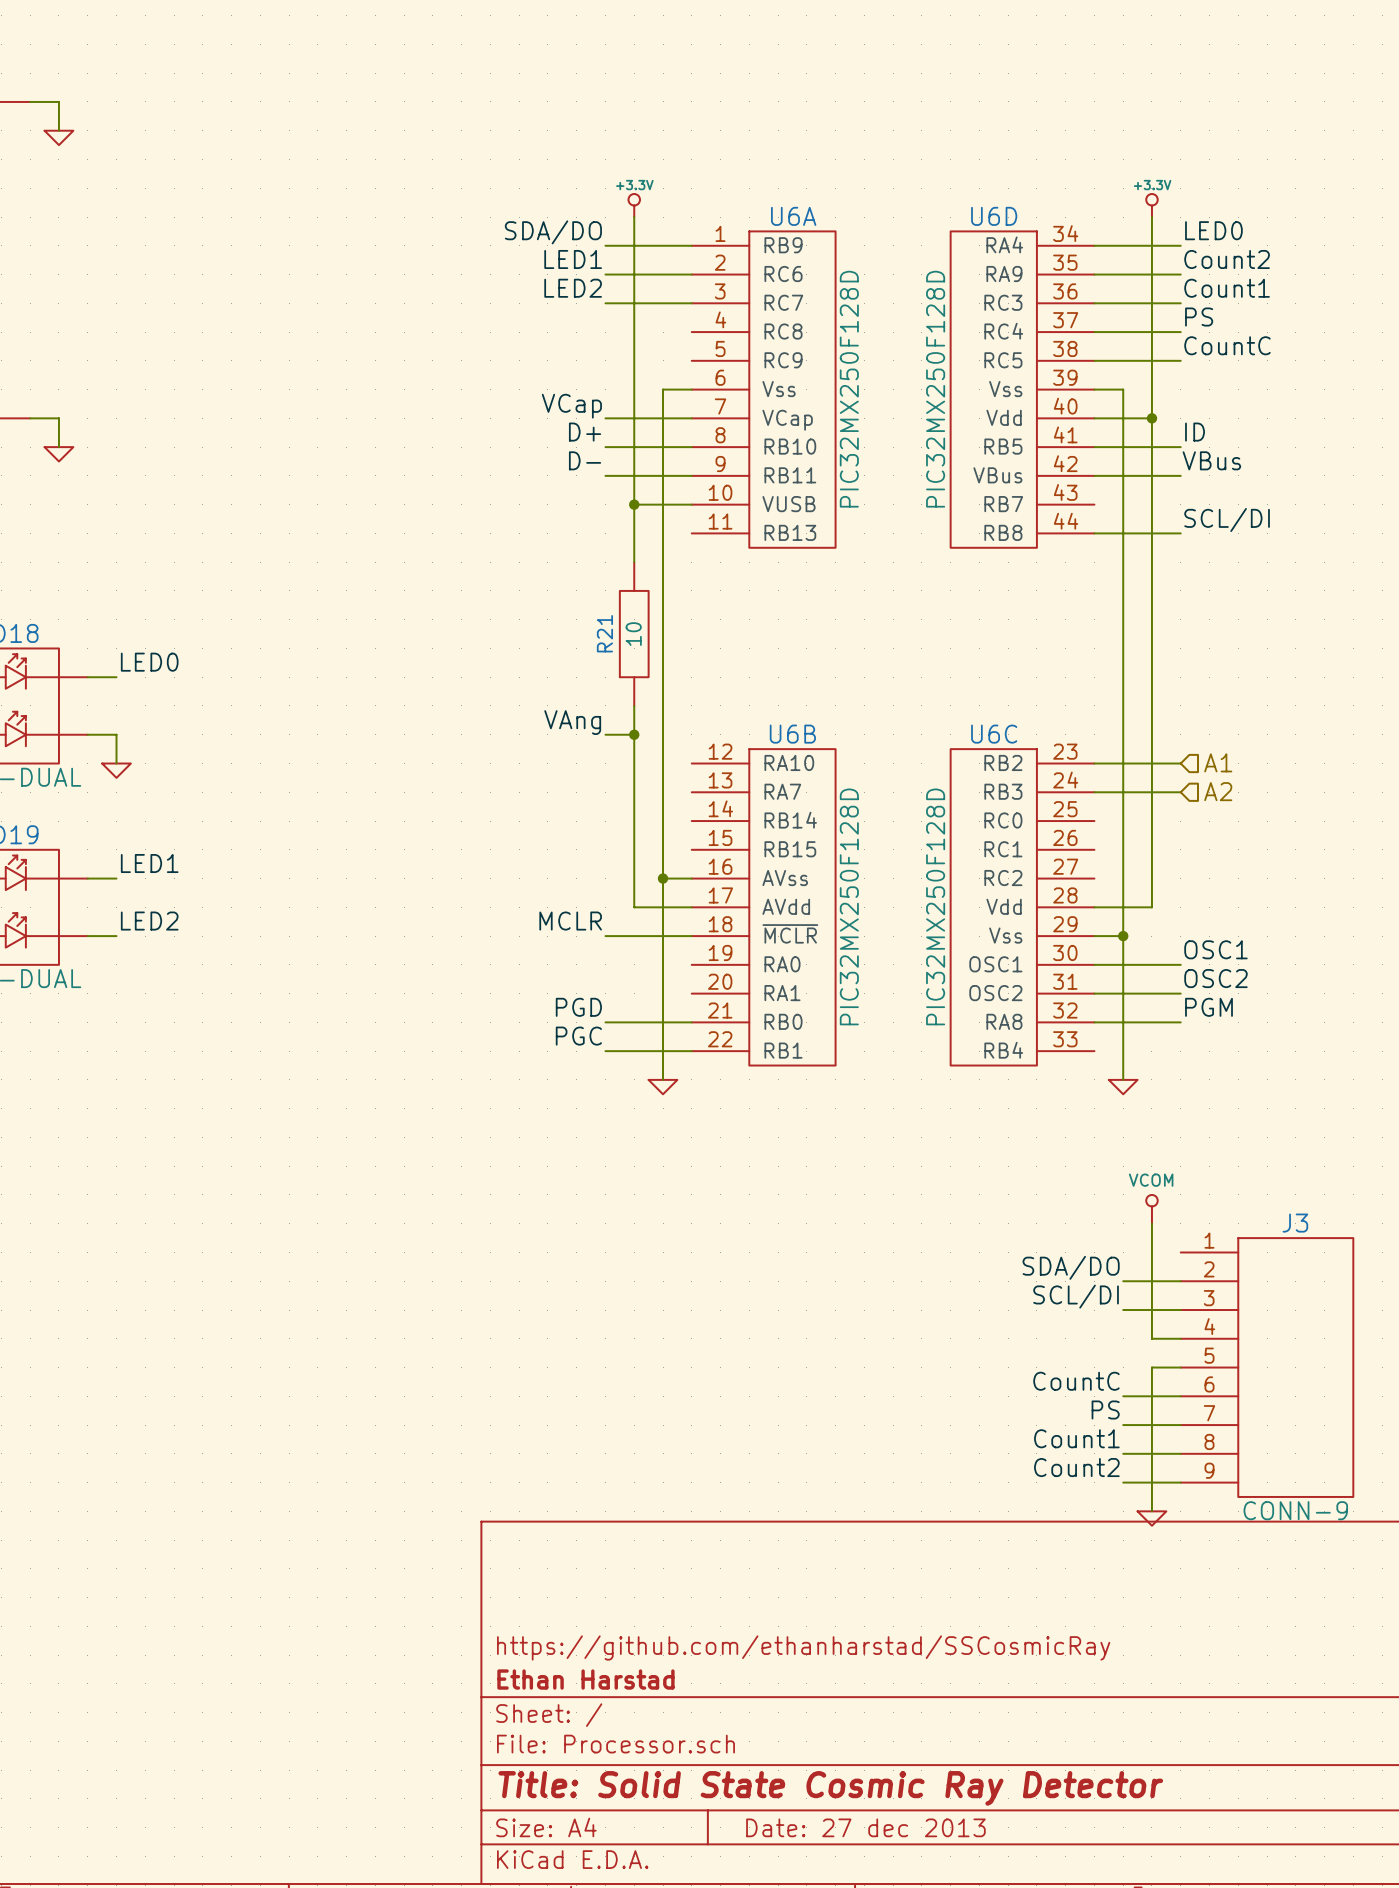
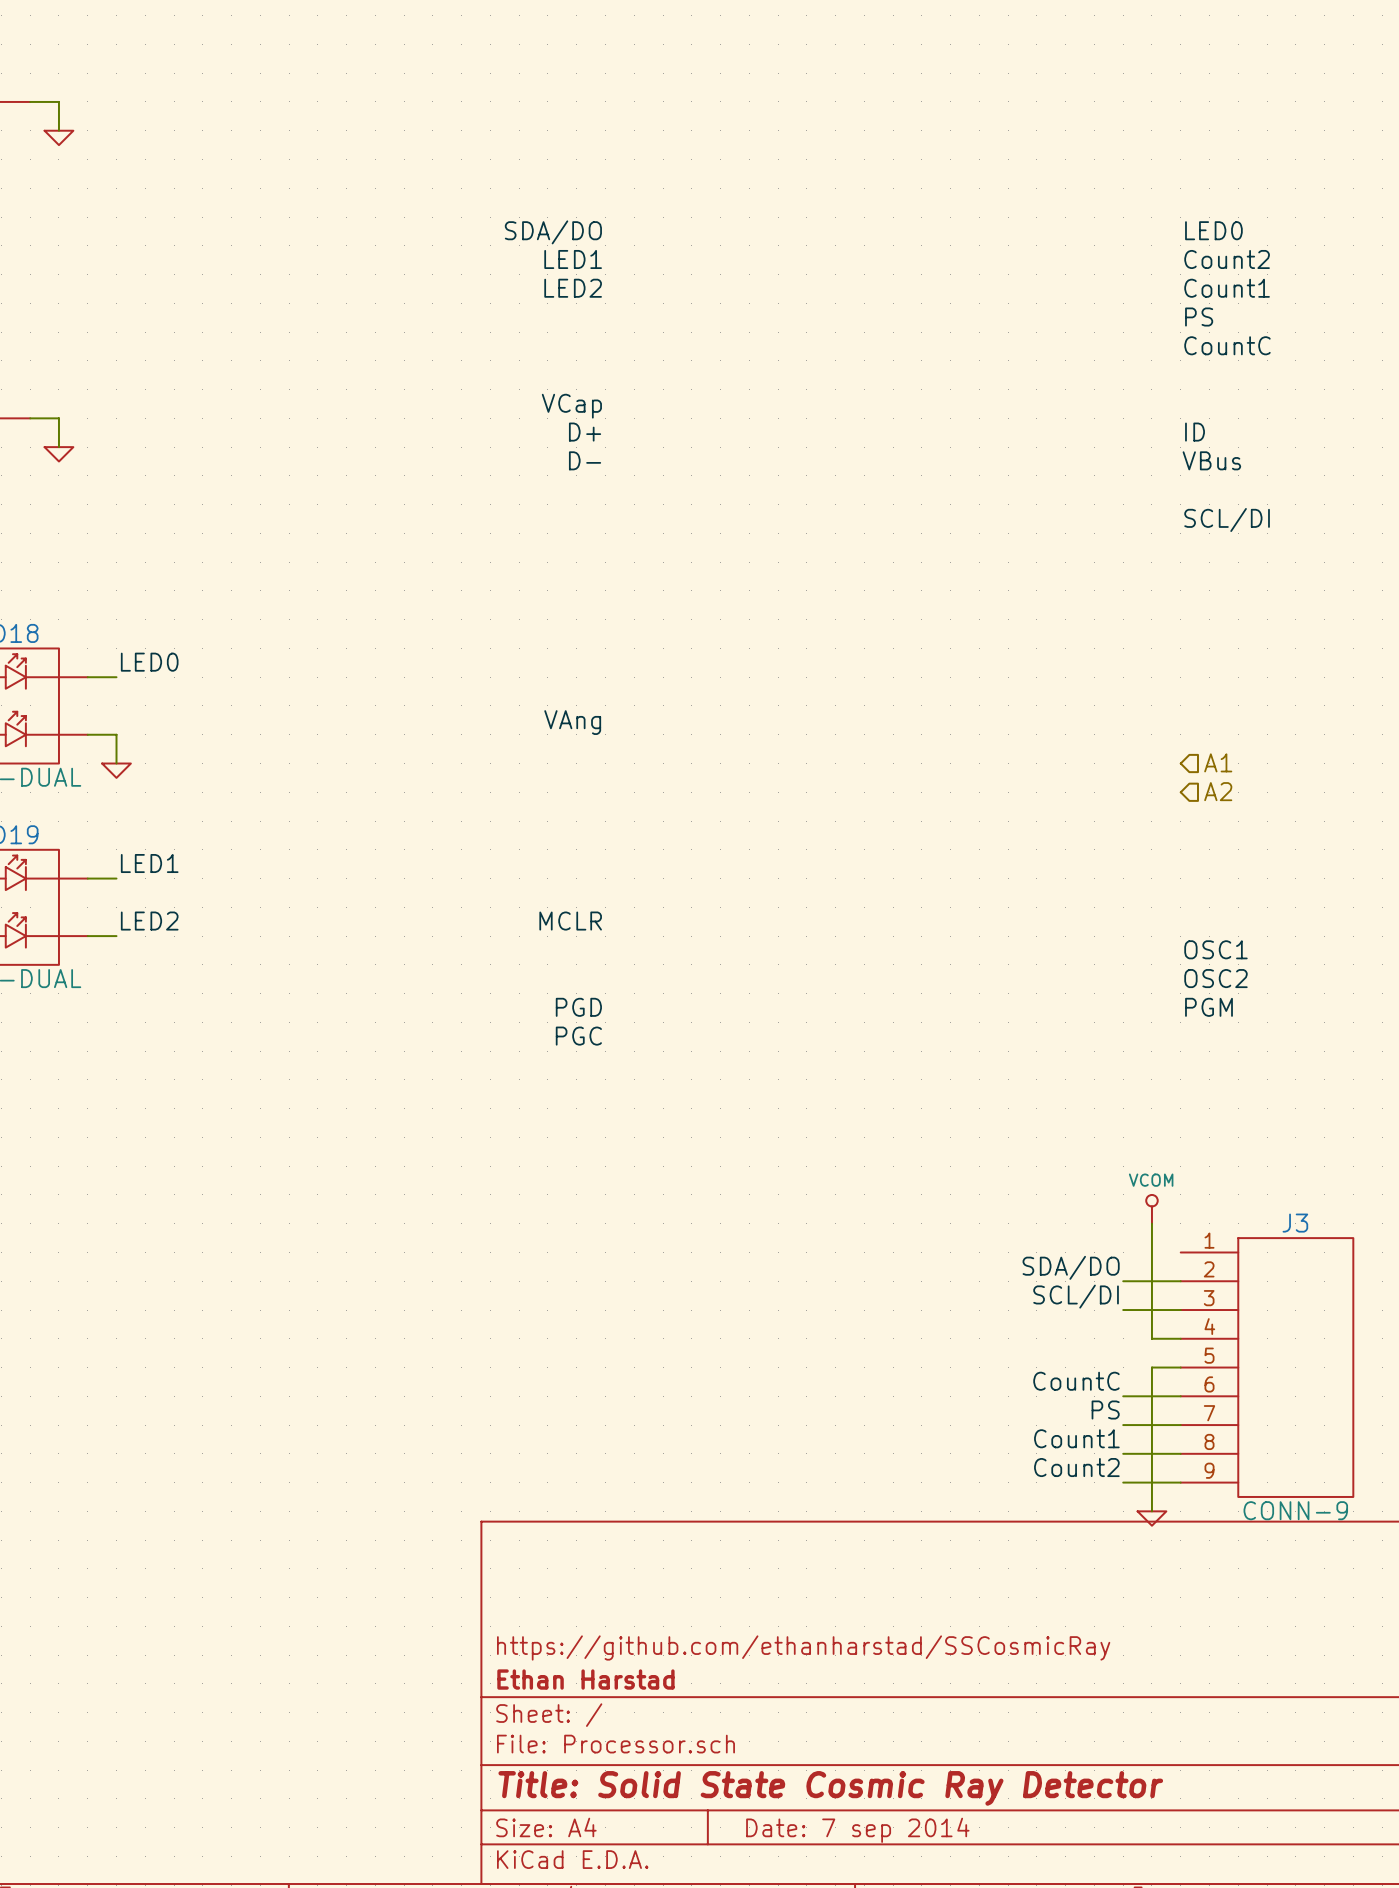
power symbol: +3.3V (634, 205) -> none
power symbol: +3.3V (1151, 205) -> none
wire: (634, 217) (634, 562) -> none
wire: (1151, 217) (1151, 907) (1094, 907) -> none
wire: (605, 245) (691, 245) -> none
wire: (1094, 245) (1180, 245) -> none
wire: (605, 274) (691, 274) -> none
wire: (1094, 274) (1180, 274) -> none
wire: (605, 303) (691, 303) -> none
wire: (1094, 303) (1180, 303) -> none
wire: (1094, 332) (1180, 332) -> none
wire: (1094, 360) (1180, 360) -> none
wire: (691, 389) (663, 389) (663, 1079) -> none
U6A: PIC32MX250F128D (763, 389) -> none
U6D: PIC32MX250F128D (1022, 389) -> none
wire: (1094, 389) (1123, 389) (1123, 1079) -> none
wire: (605, 418) (691, 418) -> none
wire: (1094, 418) (1151, 418) -> none
junction: (1151, 418) -> none
wire: (605, 447) (691, 447) -> none
wire: (1094, 447) (1180, 447) -> none
wire: (605, 475) (691, 475) -> none
wire: (1094, 475) (1180, 475) -> none
wire: (634, 504) (691, 504) -> none
junction: (634, 504) -> none
wire: (1094, 533) (1180, 533) -> none
R21: 10 (634, 634) -> none
wire: (634, 705) (634, 907) (691, 907) -> none
wire: (605, 734) (634, 734) -> none
junction: (634, 734) -> none
wire: (1094, 763) (1180, 763) -> none
wire: (1094, 792) (1180, 792) -> none
wire: (663, 878) (691, 878) -> none
junction: (663, 878) -> none
U6B: PIC32MX250F128D (763, 907) -> none
U6C: PIC32MX250F128D (1022, 907) -> none
wire: (605, 936) (691, 936) -> none
wire: (1094, 936) (1123, 936) -> none
junction: (1123, 936) -> none
wire: (1094, 964) (1180, 964) -> none
wire: (1094, 993) (1180, 993) -> none
wire: (605, 1022) (691, 1022) -> none
wire: (1094, 1022) (1180, 1022) -> none
wire: (605, 1051) (691, 1051) -> none
power symbol: (663, 1087) -> none
power symbol: (1123, 1087) -> none
title block: Date: 27 dec 2013 (865, 1827) -> Date: 7 sep 2014 (857, 1830)

